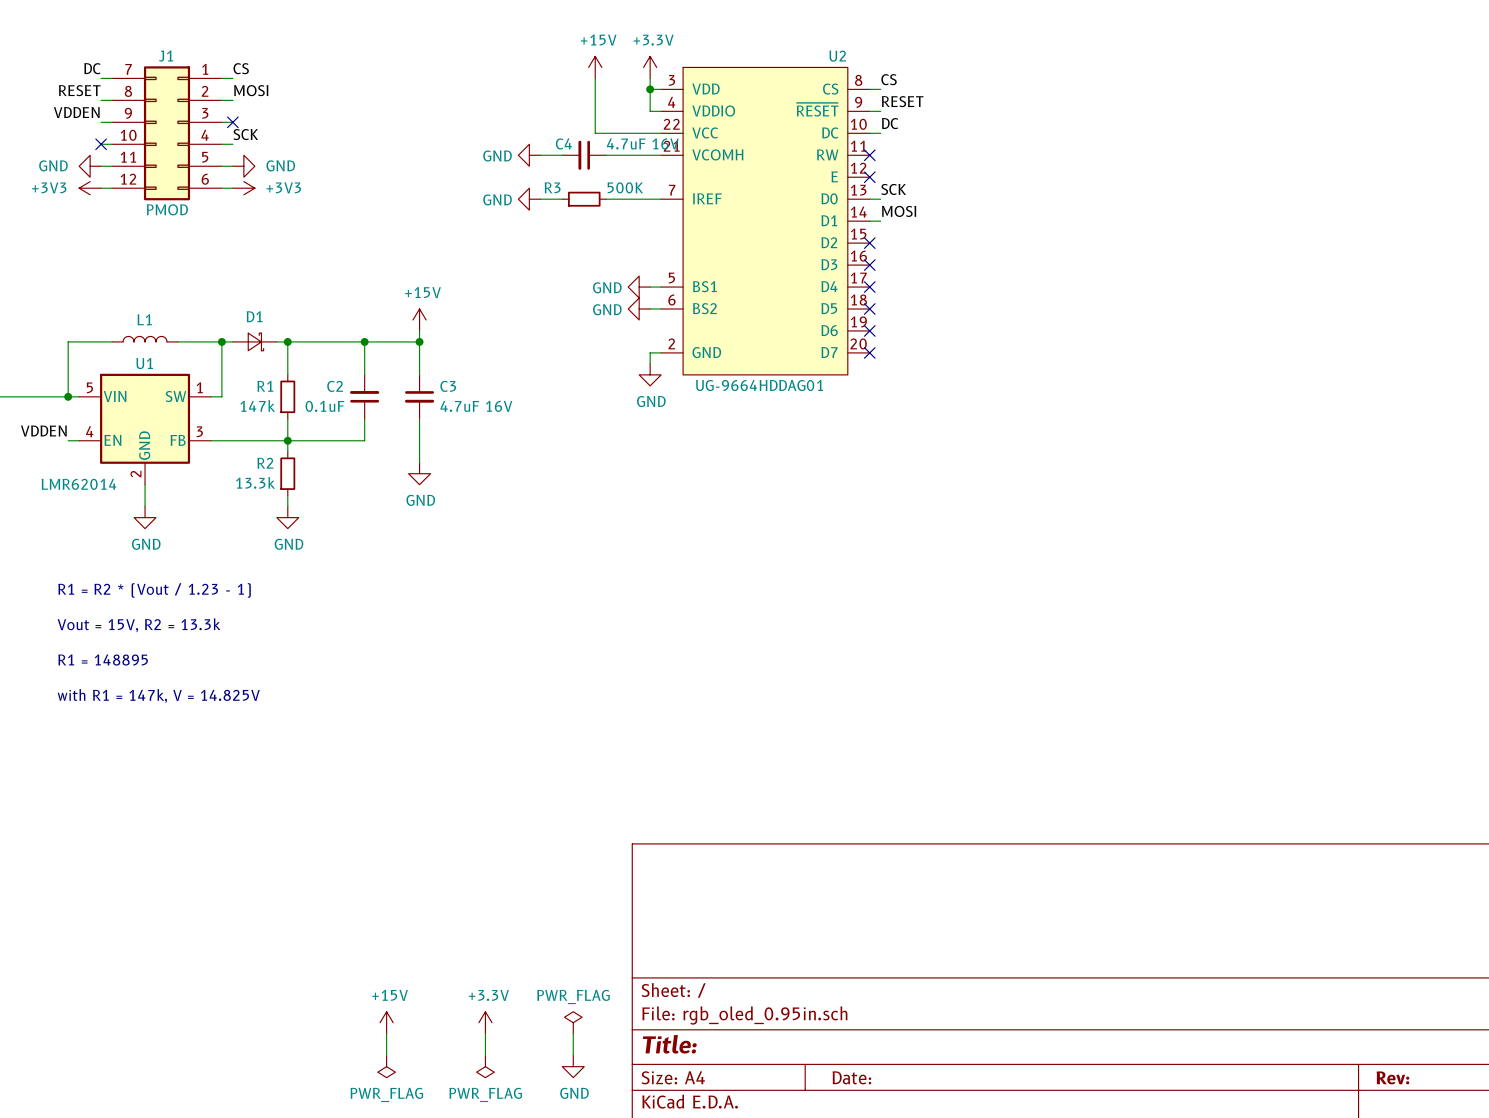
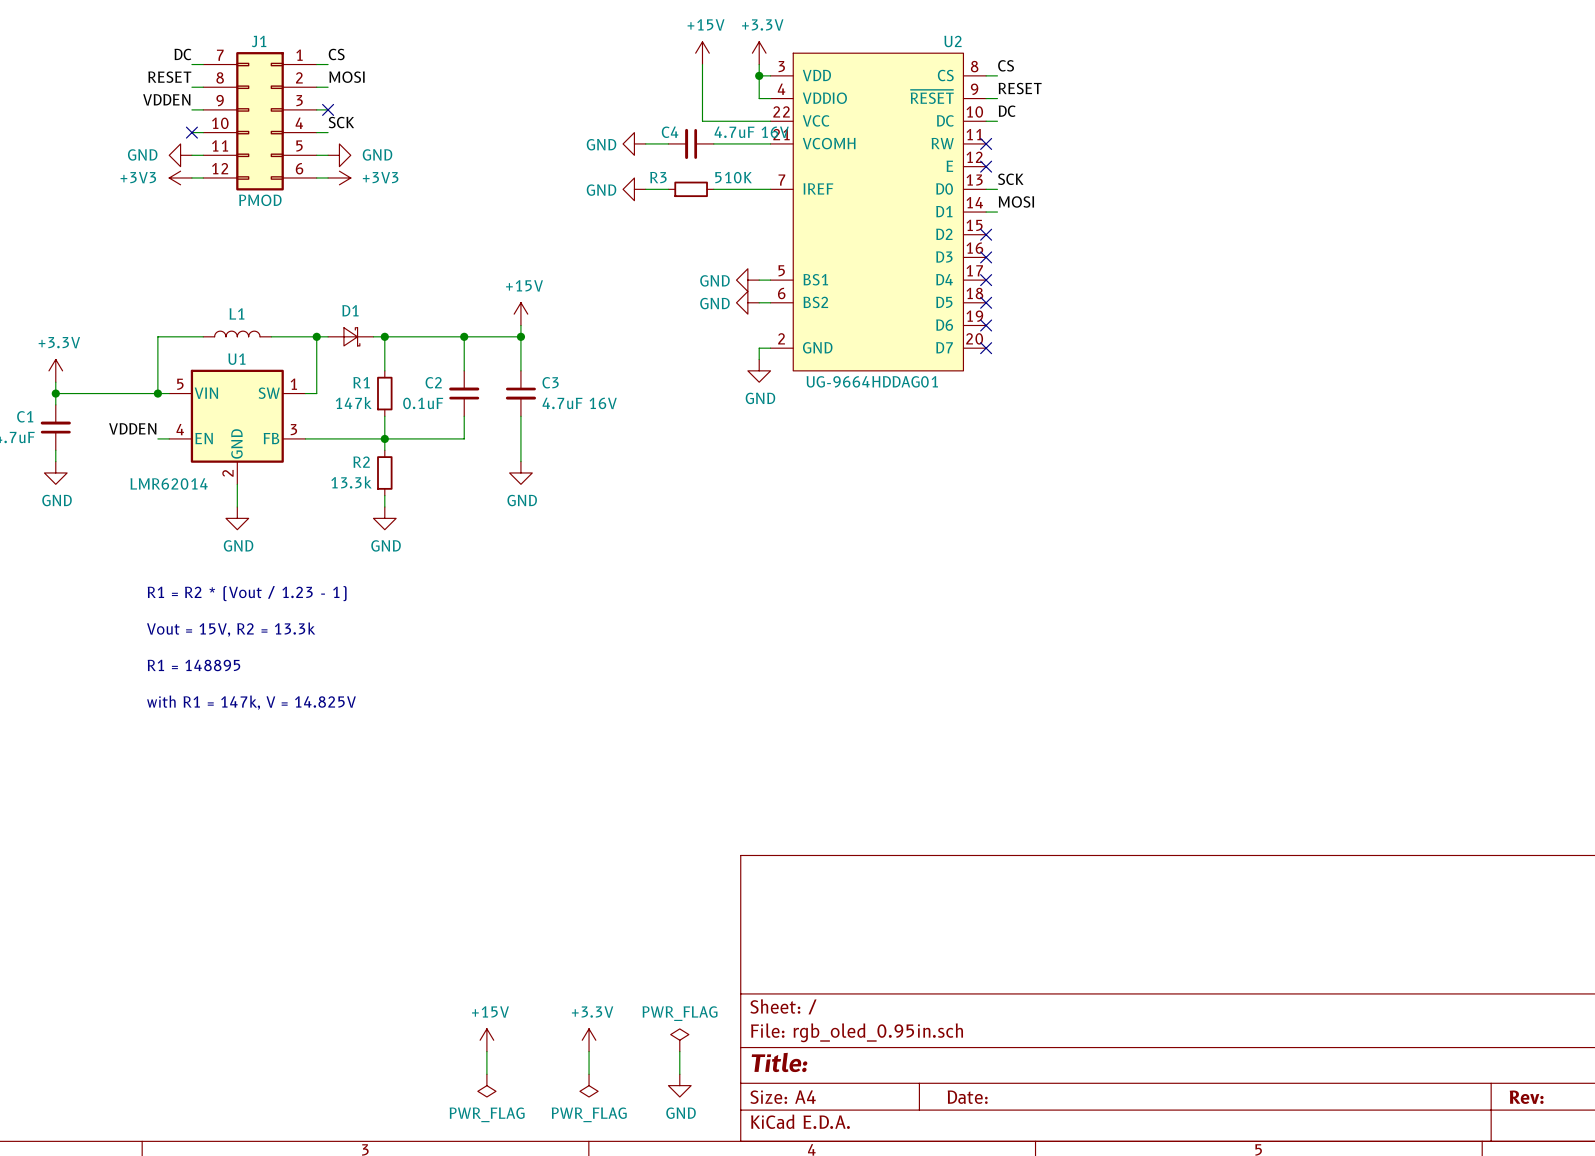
R3 value: 500K (625, 187) -> 510K (733, 177)

